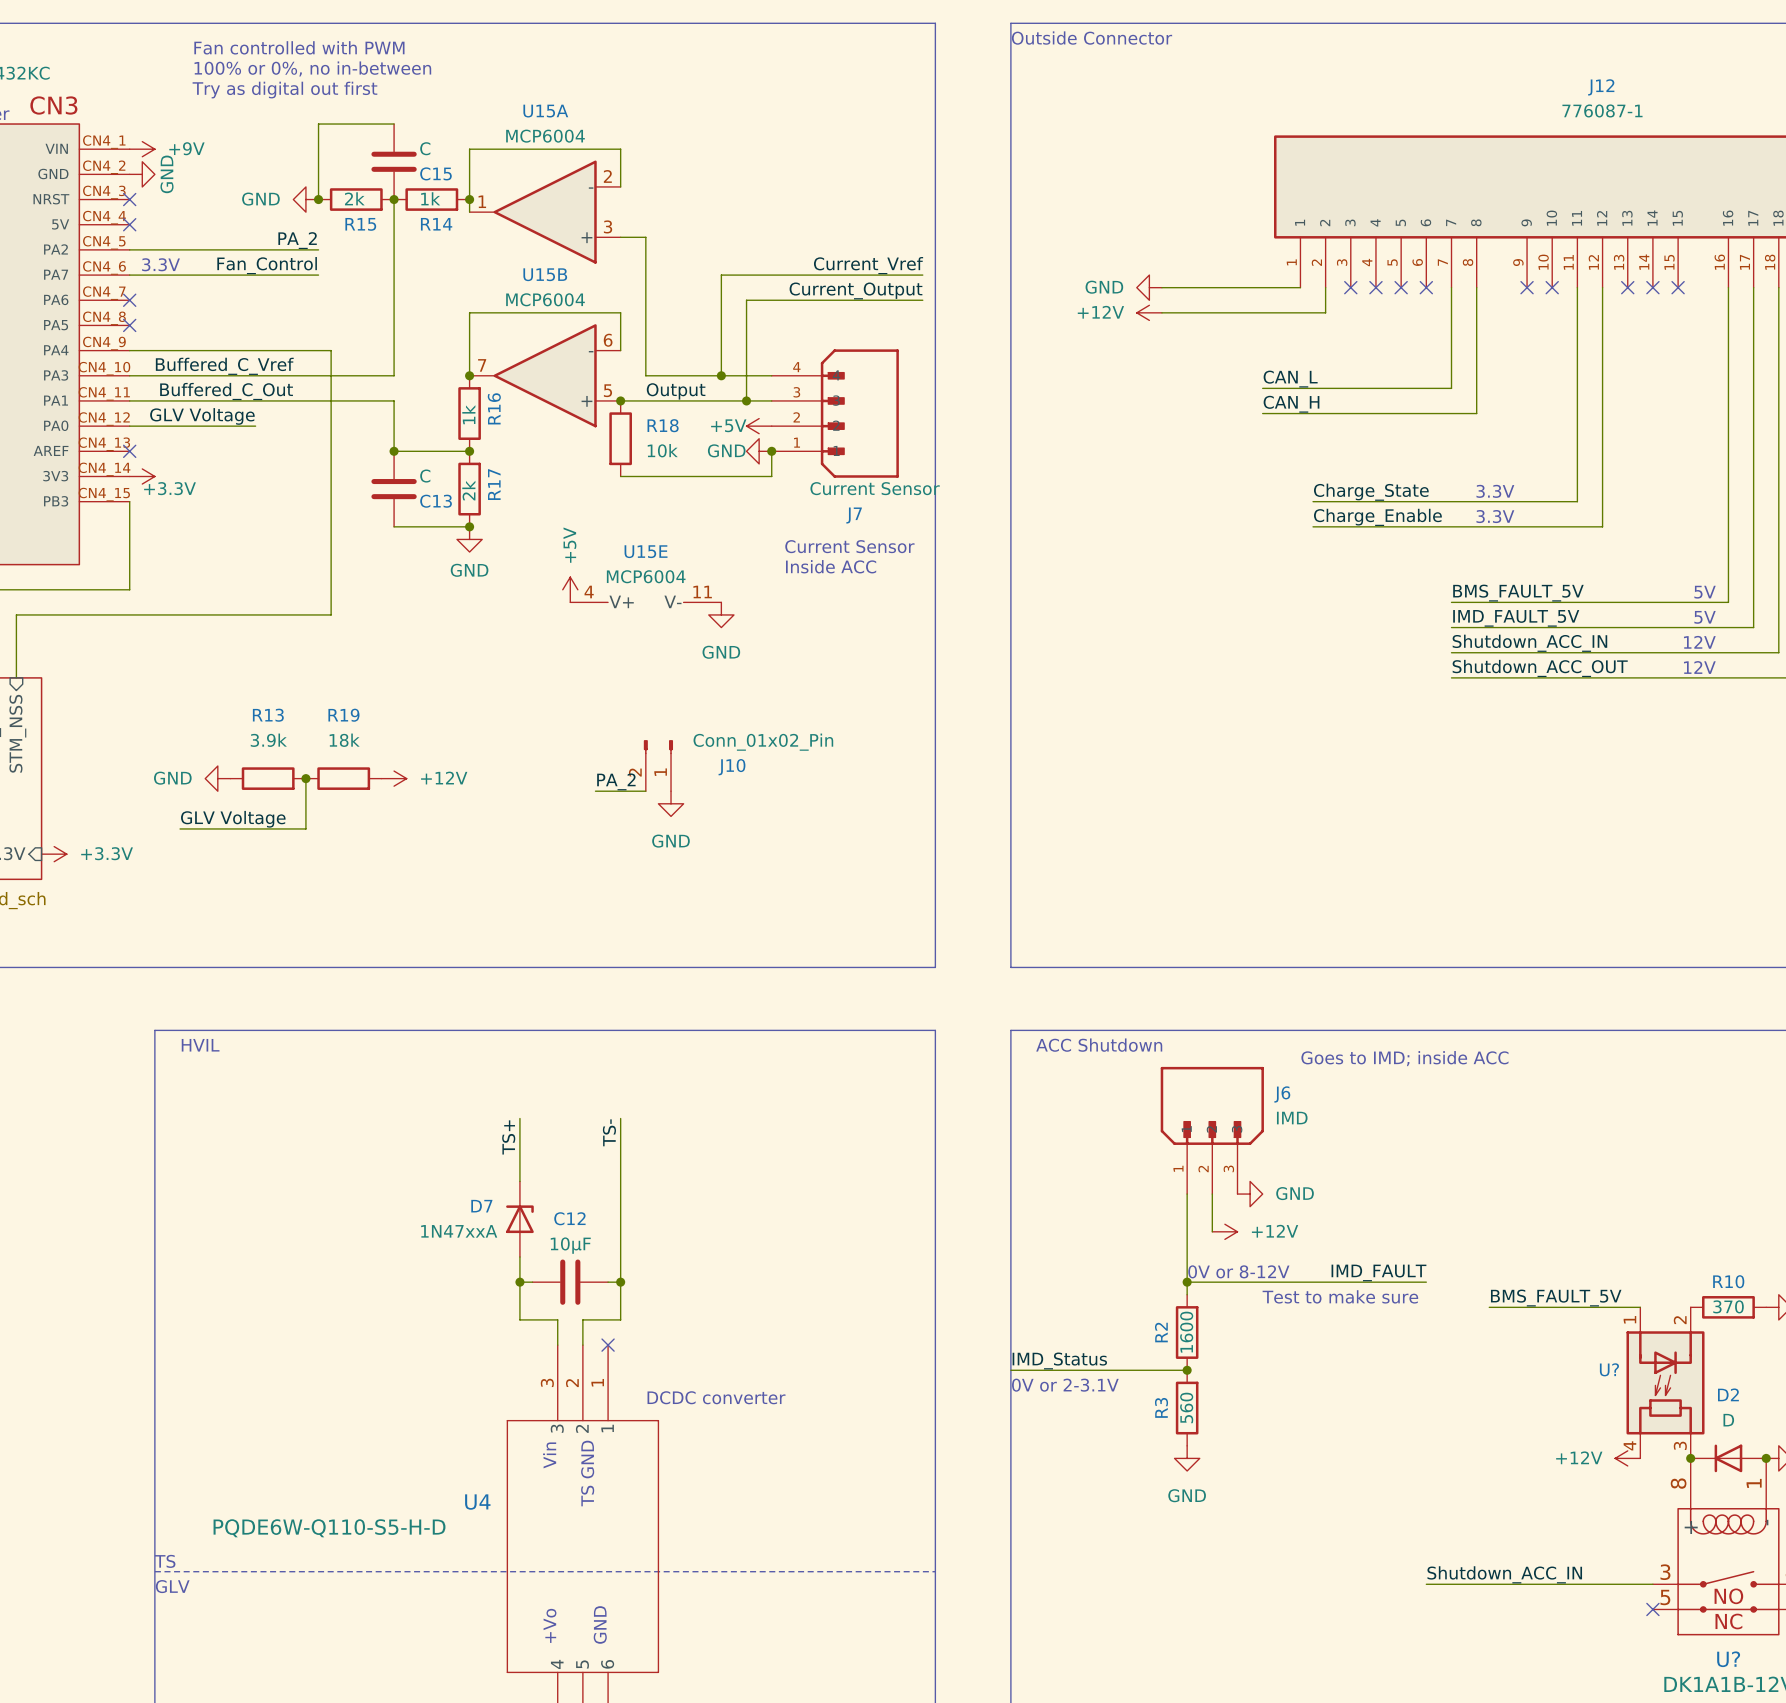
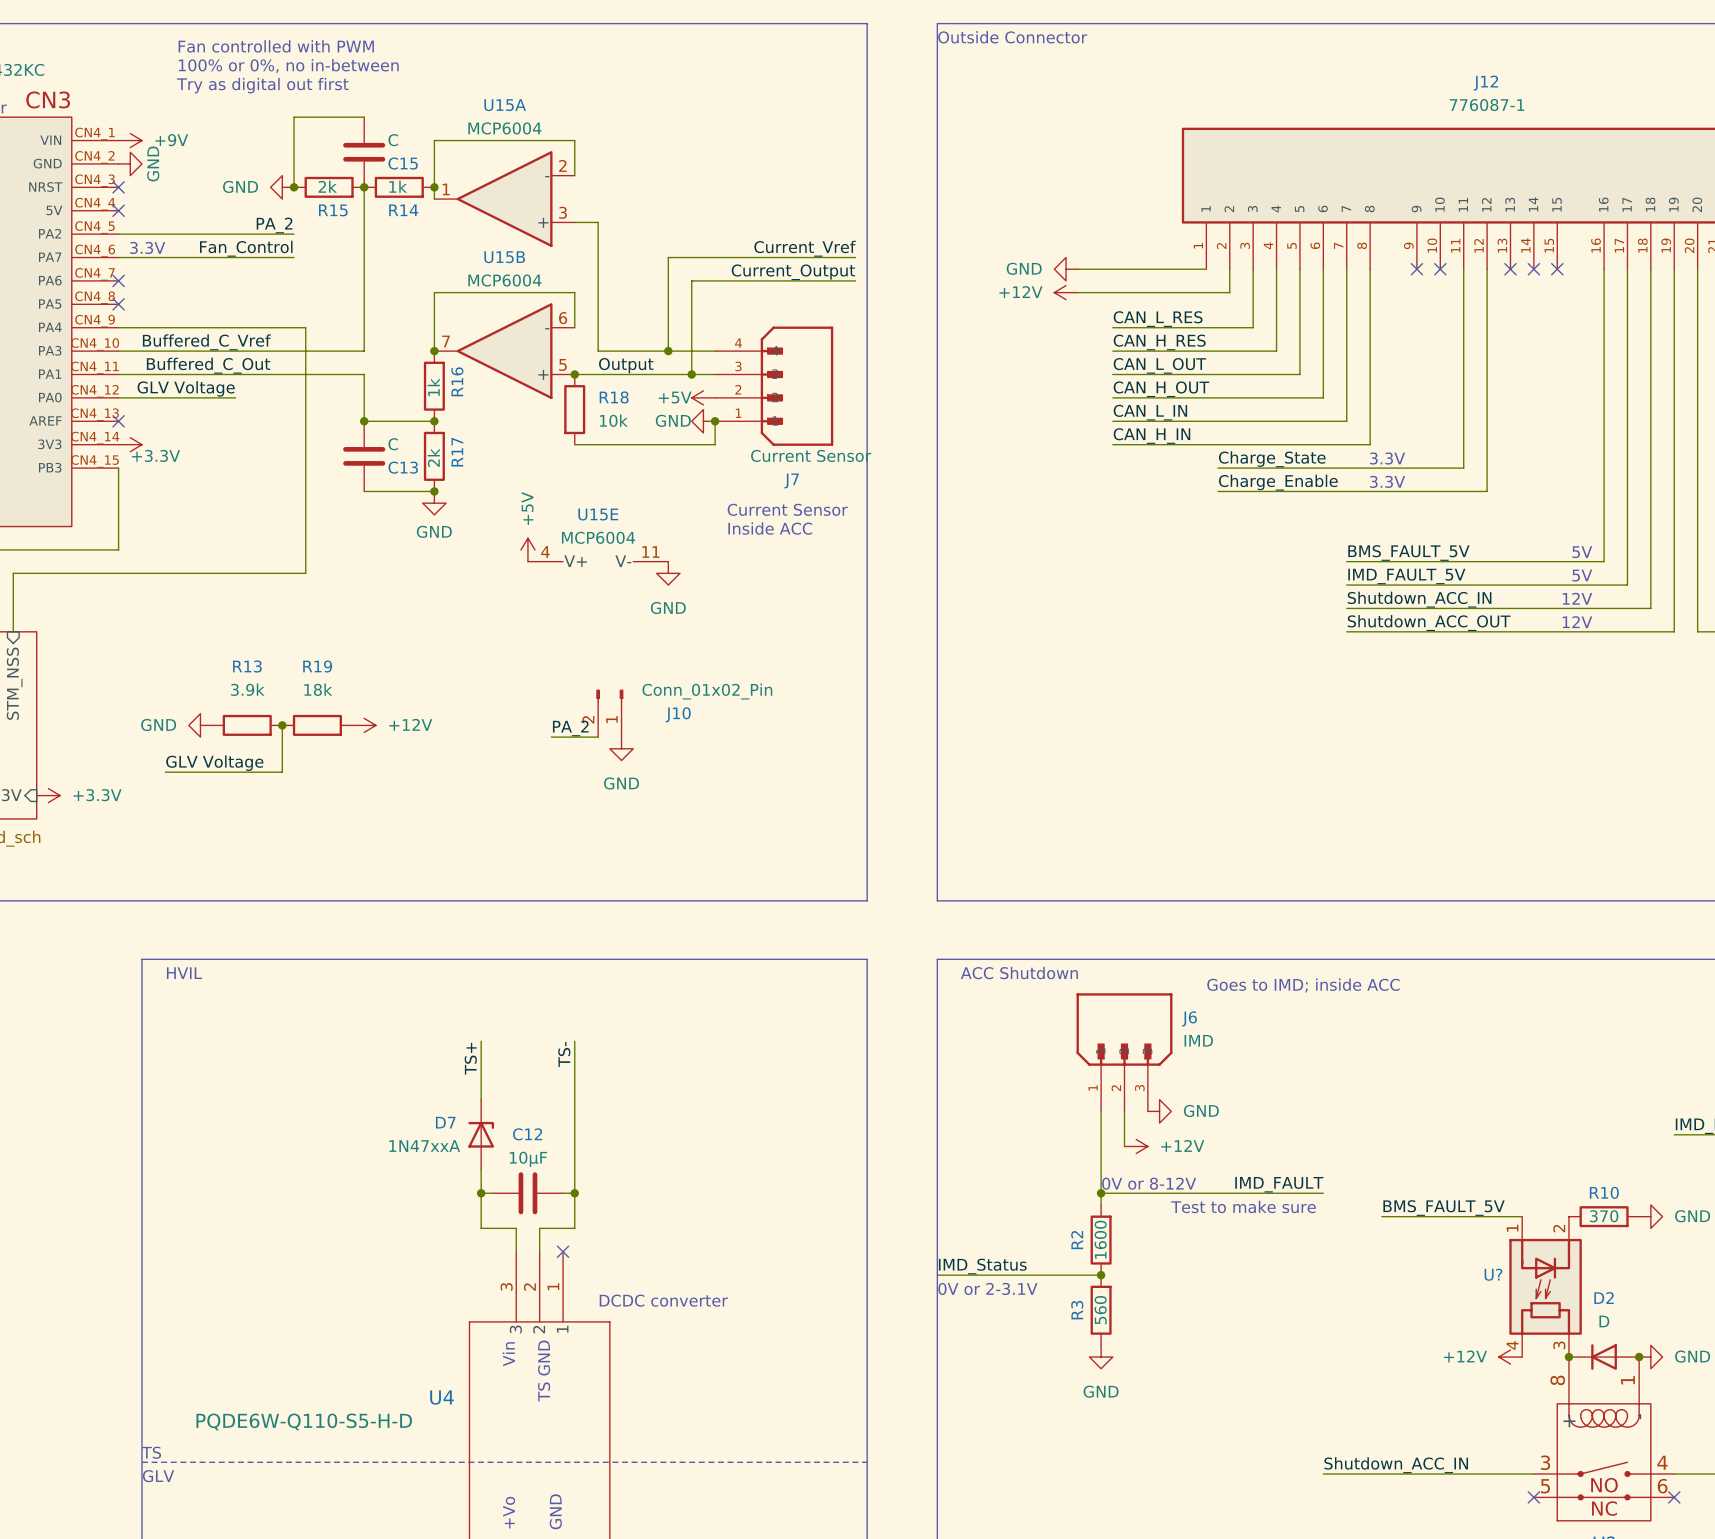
wire: none -> (1253, 269) (1253, 327) (1112, 327)
no-connect mark: (1350, 287) -> none
wire: none -> (1276, 269) (1276, 351) (1112, 351)
no-connect mark: (1375, 287) -> none
wire: none -> (1299, 269) (1299, 374) (1112, 374)
no-connect mark: (1401, 287) -> none
wire: none -> (1323, 269) (1323, 397) (1112, 397)
no-connect mark: (1426, 287) -> none
label: none -> CAN_L_RES (1158, 319)
label: none -> CAN_H_RES (1159, 342)
label: CAN_L (1290, 379) -> CAN_L_OUT (1159, 365)
wire: (1262, 388) (1451, 388) -> (1112, 421) (1346, 421) (1346, 362)
label: CAN_H (1291, 404) -> CAN_H_OUT (1161, 389)
wire: (1262, 413) (1476, 413) -> (1112, 444) (1370, 444) (1370, 386)
label: none -> CAN_L_IN (1150, 412)
label: none -> CAN_H_IN (1151, 436)

